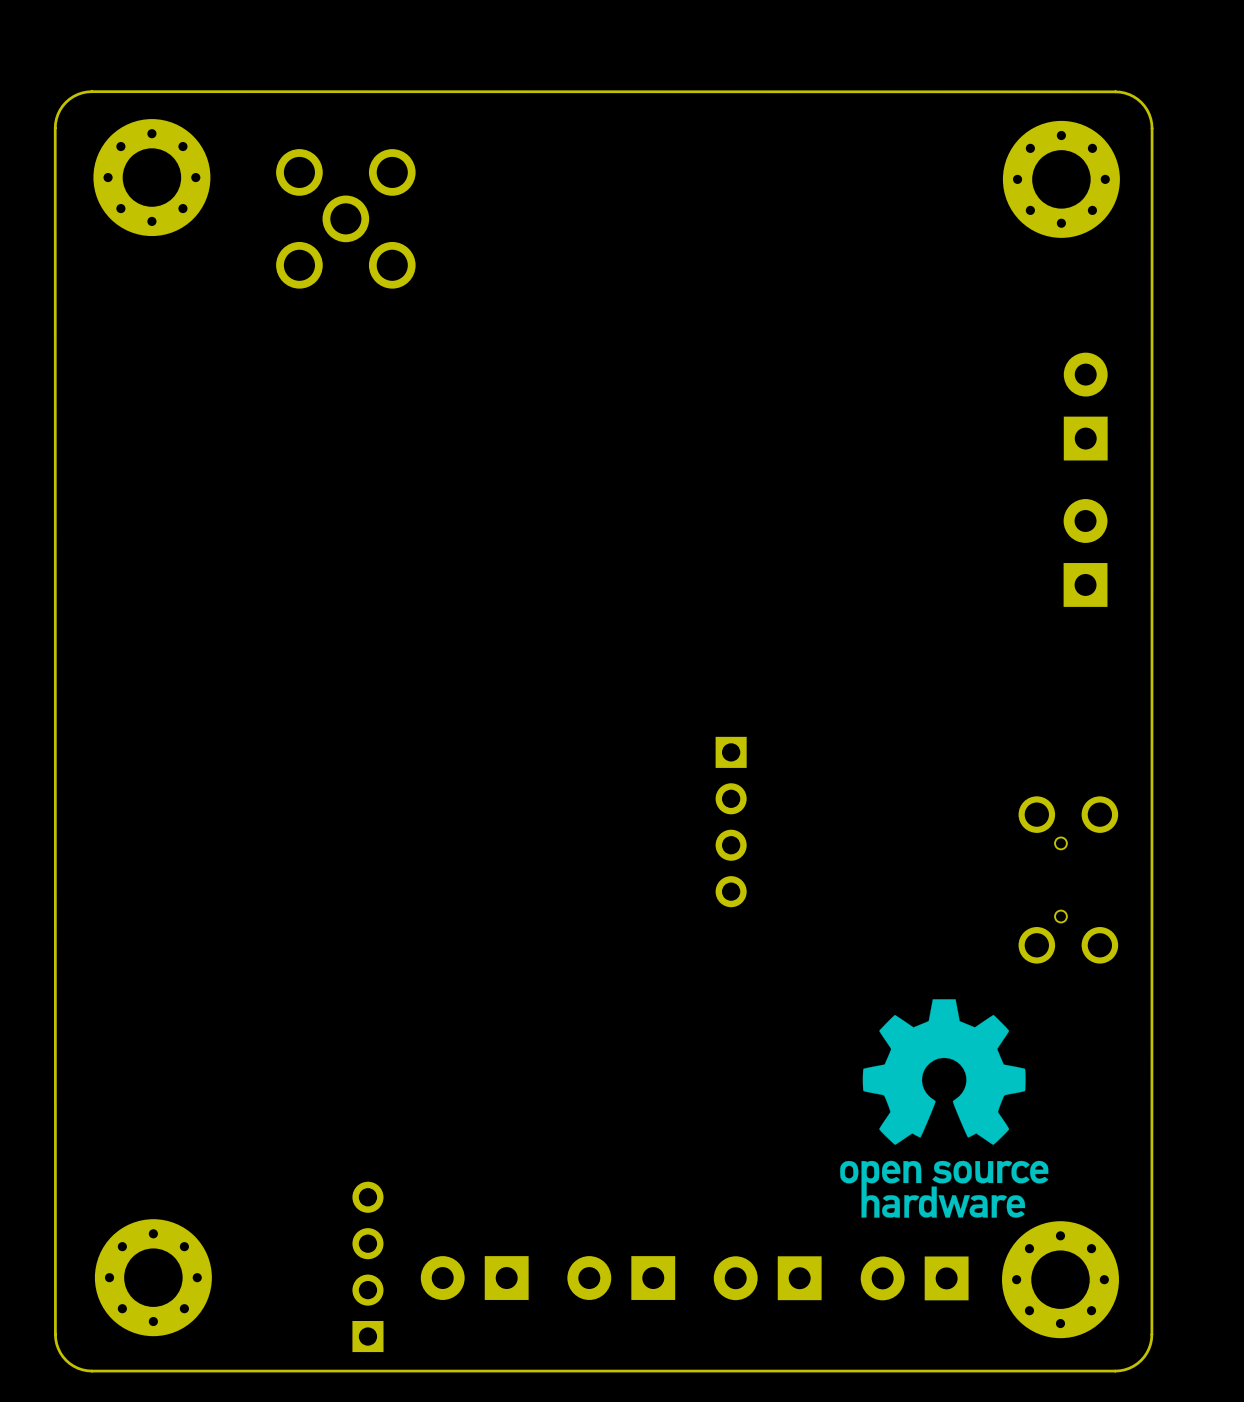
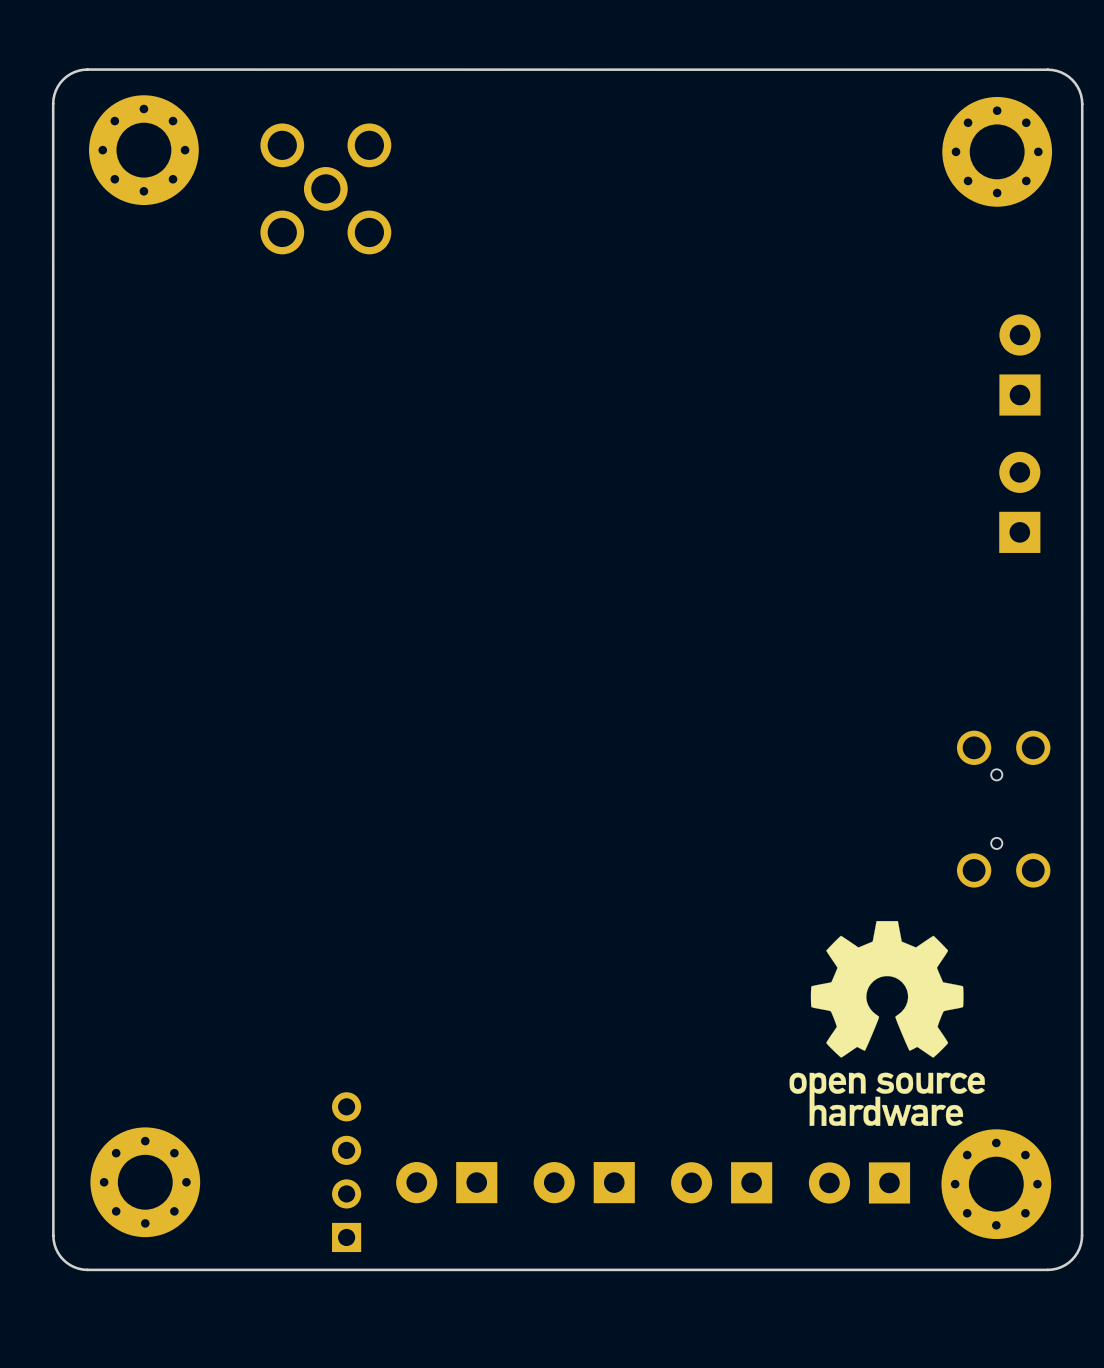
part: (731, 822) -> none

